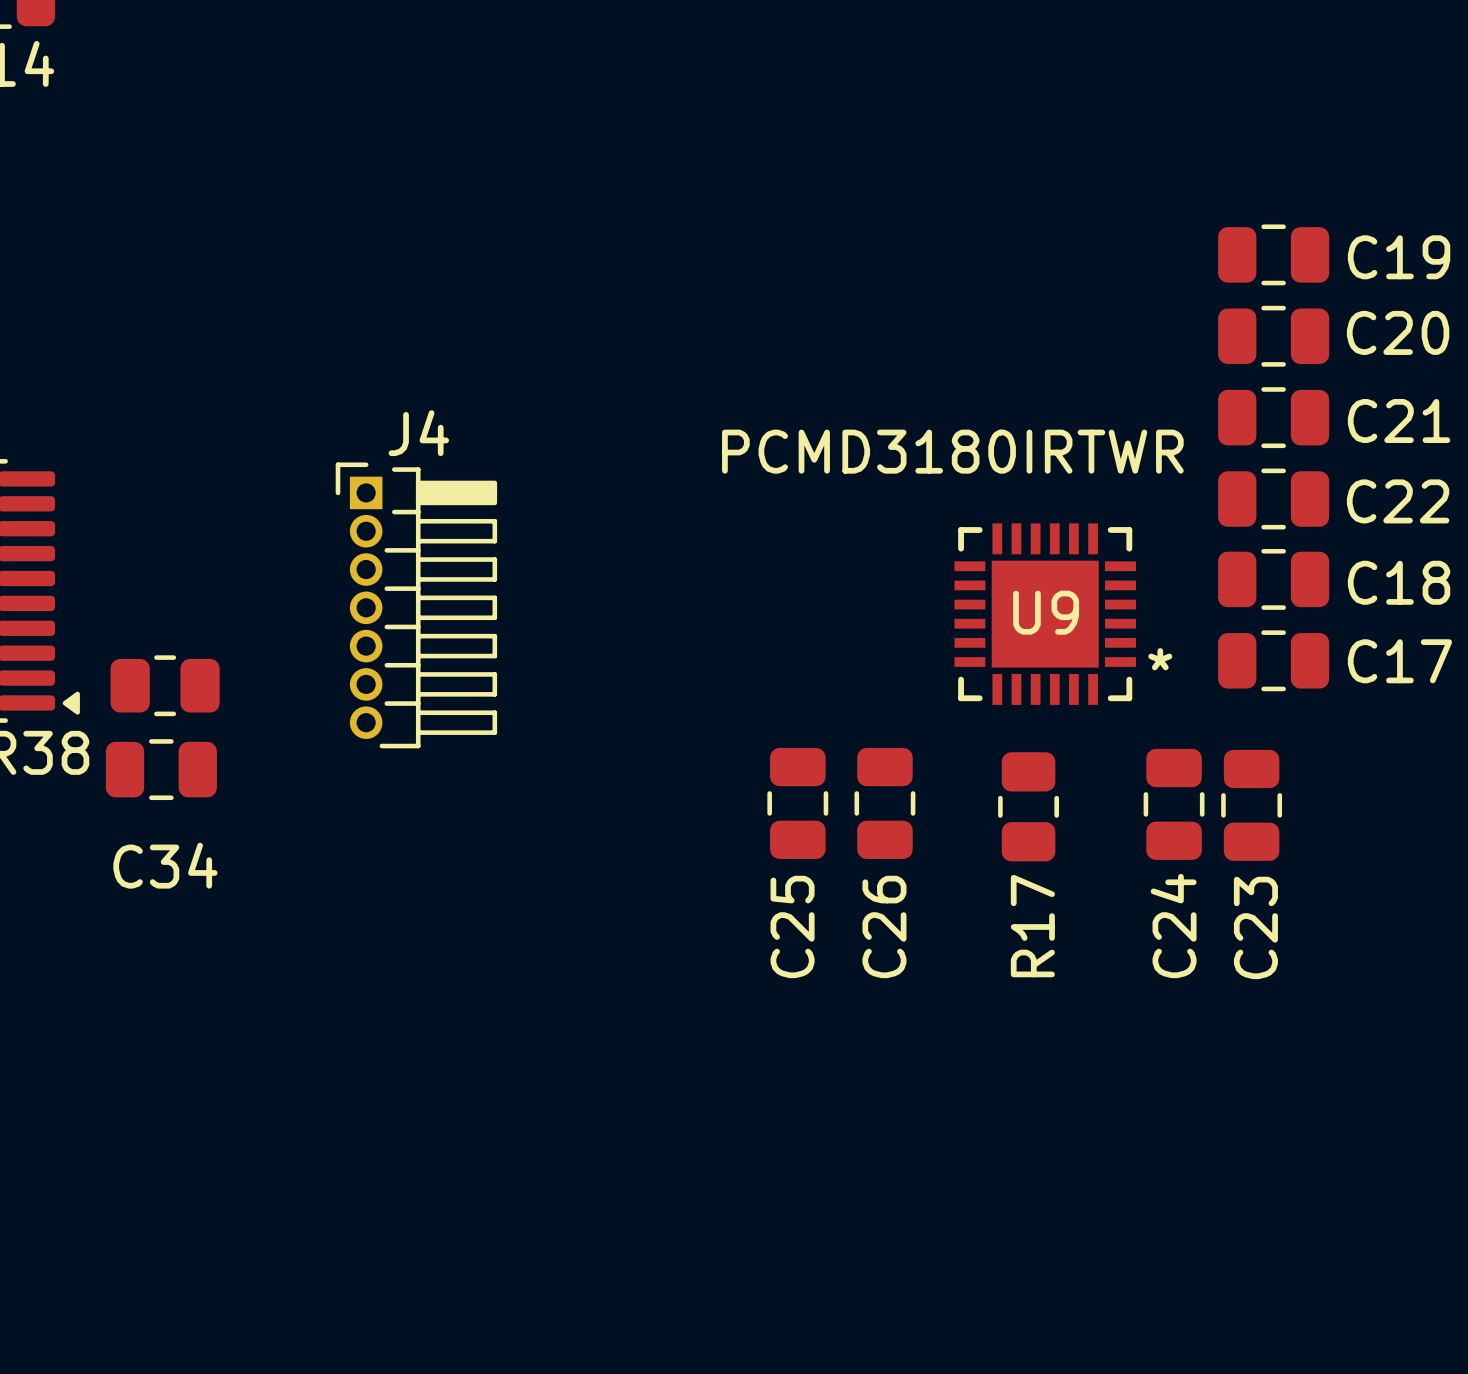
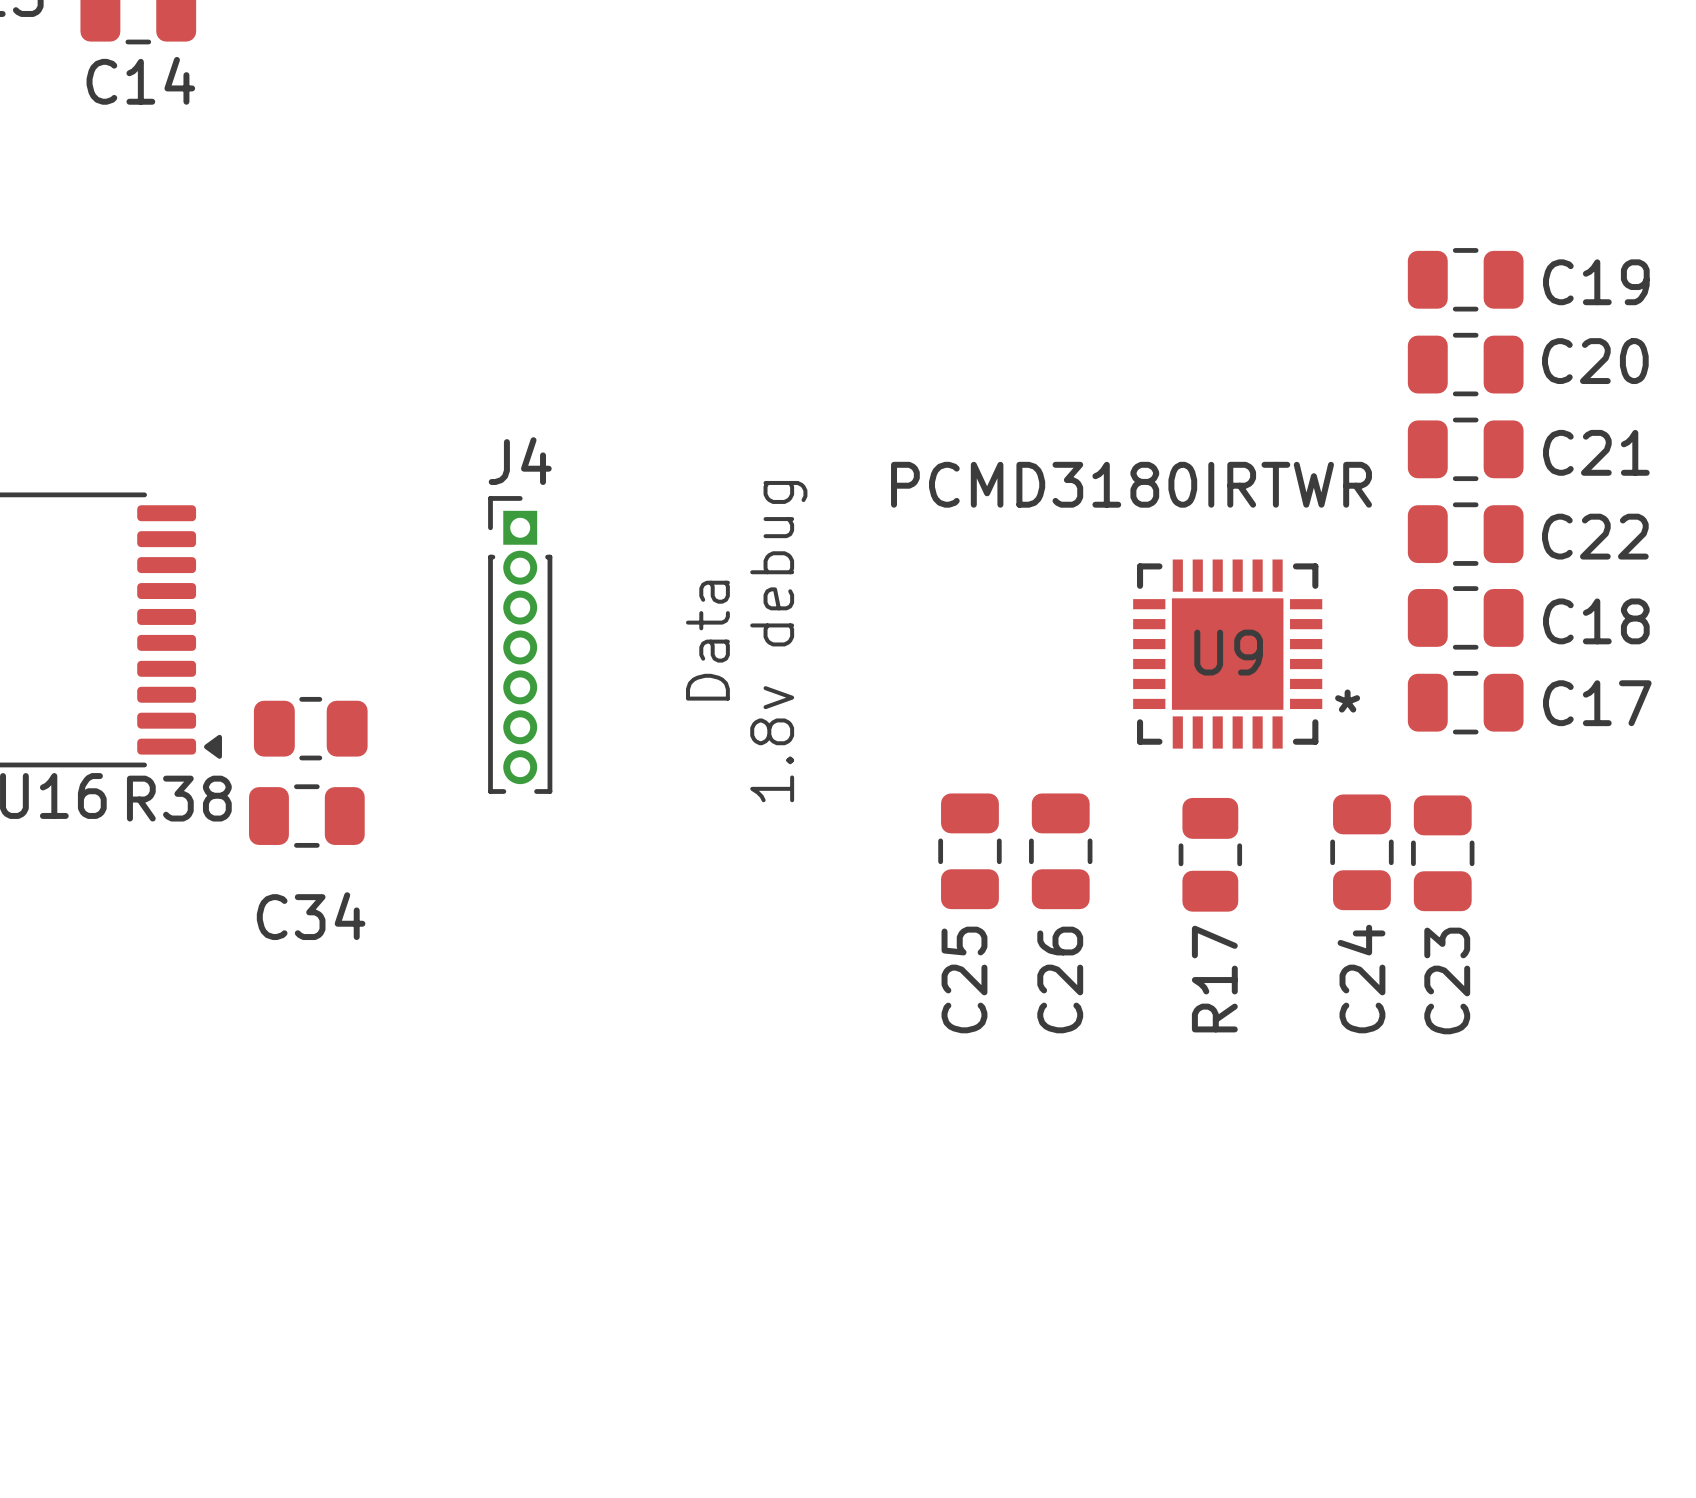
J4 footprint: [335, 462, 498, 749] -> [488, 496, 553, 794]
text: none -> Data (707, 640)
text: none -> 1.8v debug (778, 641)

